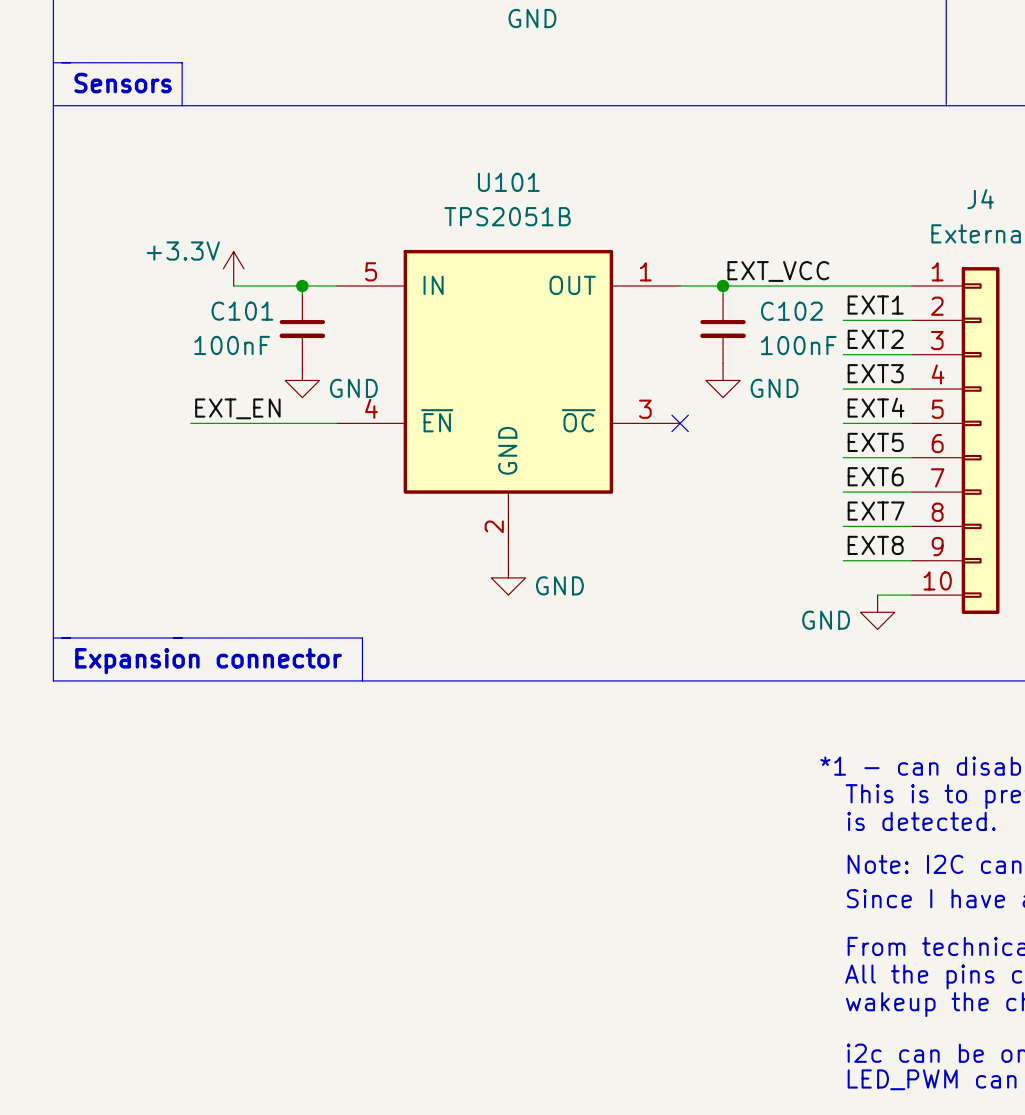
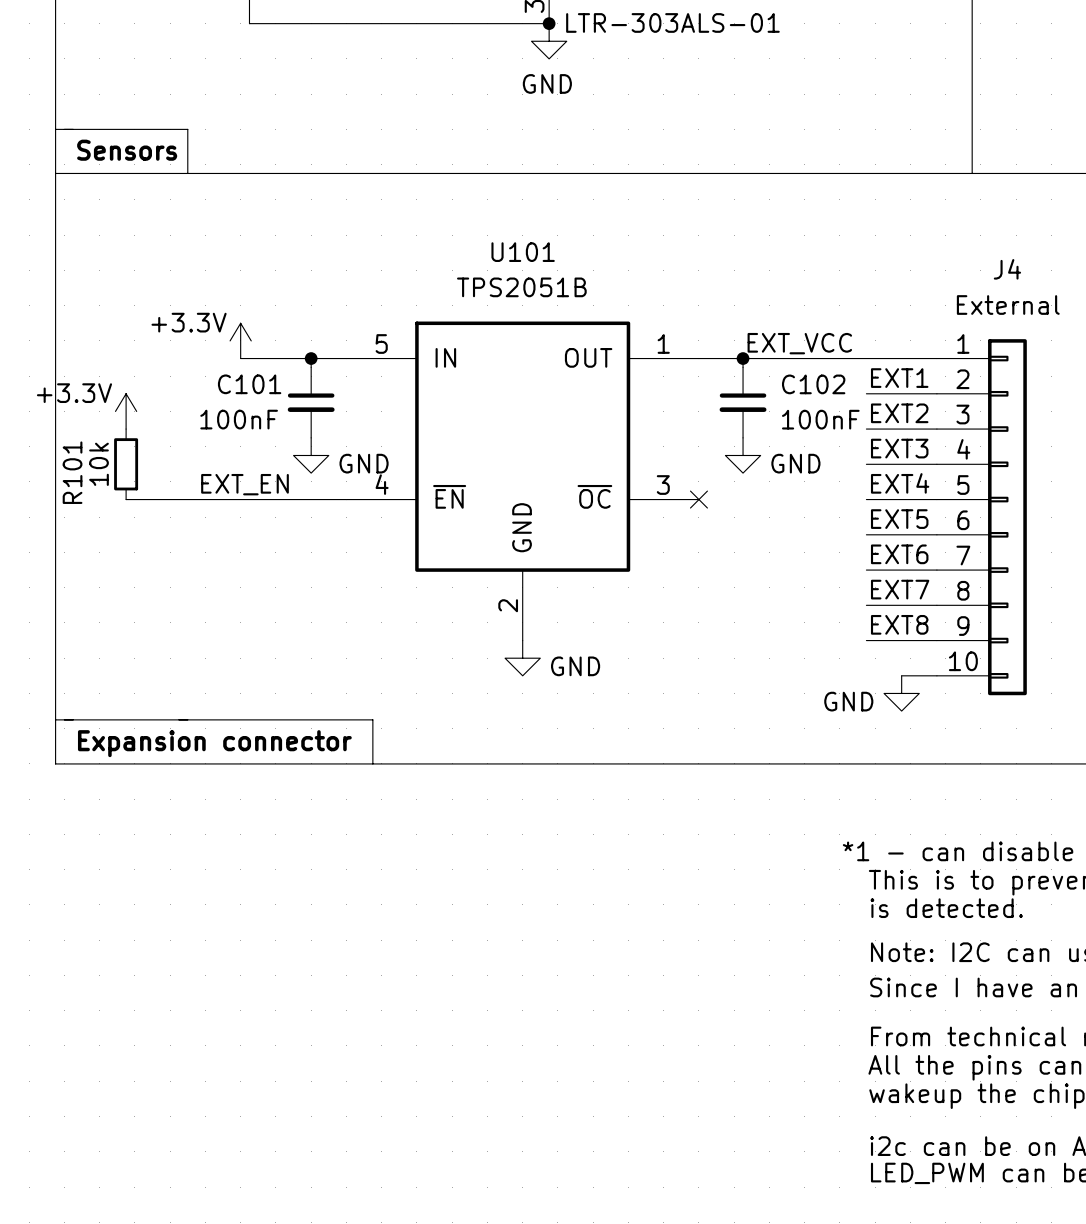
power symbol: none -> +3.3V (126, 411)
R101: none -> 10k (126, 464)
wire: none -> (126, 499) (196, 499)

